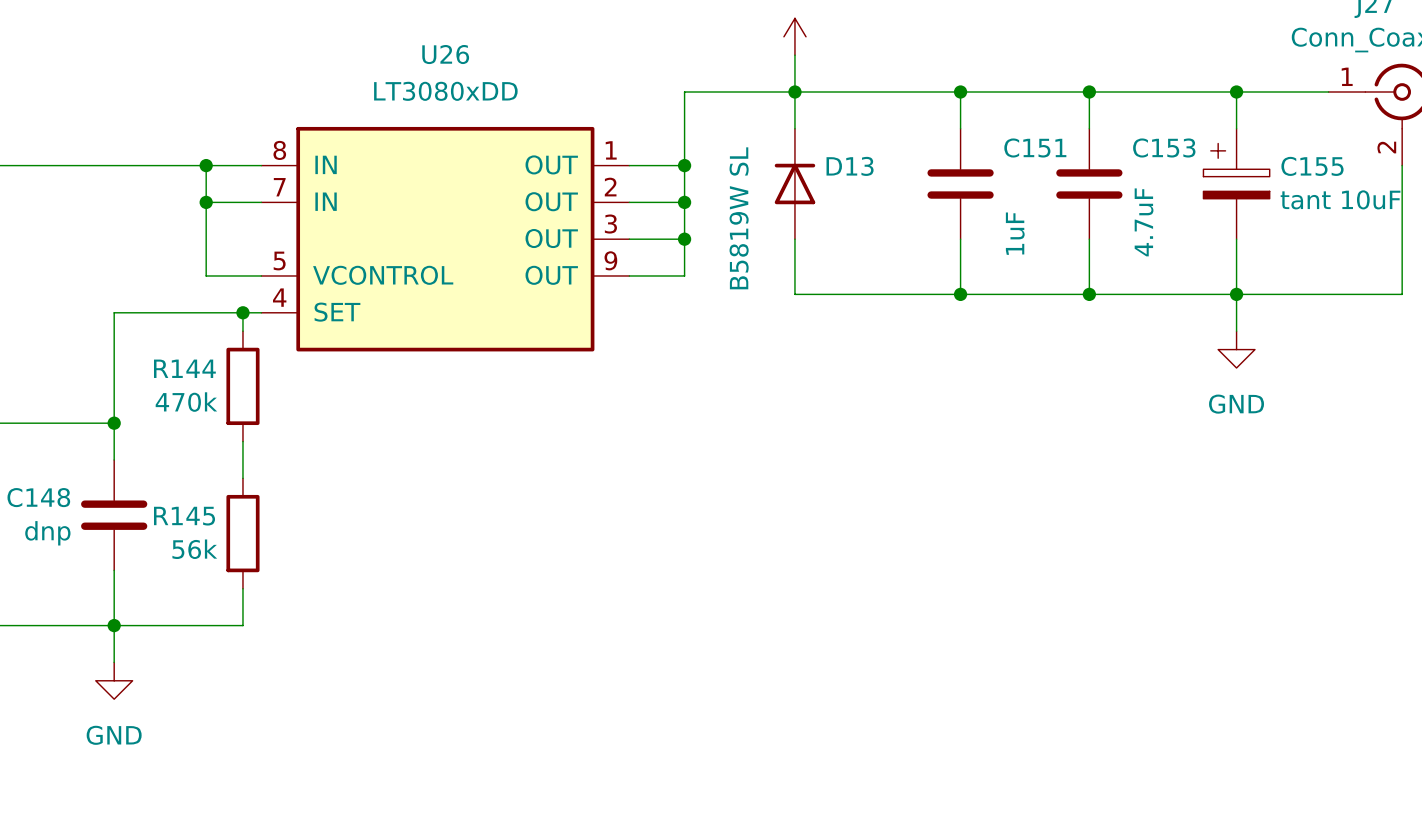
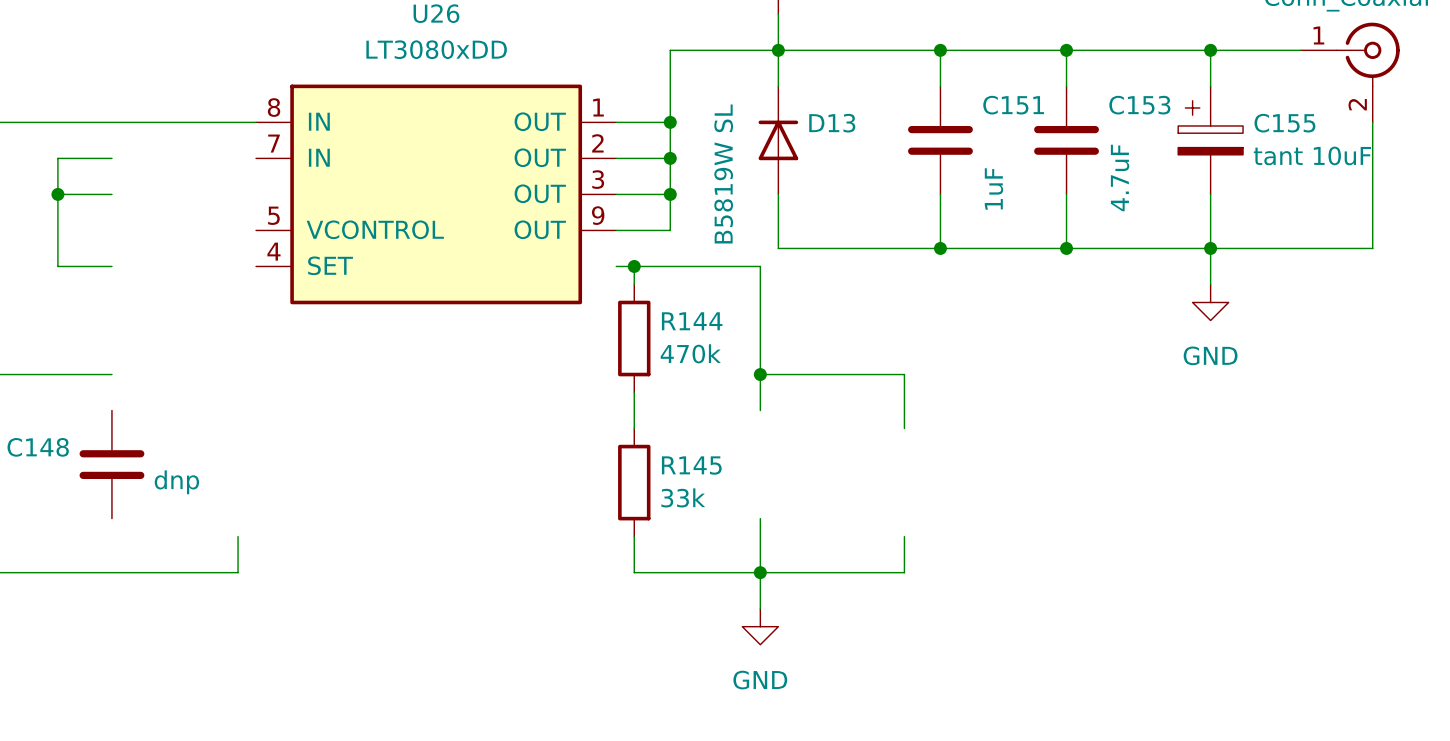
wire: (206, 165) (206, 275) (261, 275) -> none
junction: (206, 165) -> none
wire: none -> (111, 158) (57, 158) (57, 266) (111, 266)
wire: (206, 202) (261, 202) -> (57, 194) (111, 194)
junction: (206, 202) -> none
junction: none -> (57, 194)
wire: (242, 312) (242, 331) -> none
junction: (242, 312) -> none
wire: (261, 312) (114, 312) (114, 459) -> none
wire: none -> (616, 266) (760, 266) (760, 410)
wire: none -> (634, 266) (634, 284)
junction: none -> (634, 266)
R144 name position: R144 (184, 368) -> R144 (692, 321)
R144 position: (242, 386) -> (634, 338)
R144 value position: 470k (186, 402) -> 470k (690, 353)
junction: (114, 423) -> none
wire: none -> (760, 374) (904, 374) (904, 428)
junction: none -> (760, 374)
wire: (242, 441) (242, 478) -> none
wire: none -> (634, 392) (634, 428)
R145 name position: R145 (184, 516) -> R145 (691, 465)
C148 value position: dnp (47, 533) -> dnp (176, 482)
R145 position: (242, 533) -> (634, 482)
R145 value: 56k (194, 549) -> 33k (683, 497)
wire: (114, 570) (114, 662) -> none
wire: none -> (760, 518) (760, 608)
wire: none -> (634, 536) (634, 572) (904, 572) (904, 536)
junction: (114, 625) -> none
junction: none -> (760, 572)
power symbol: GND (114, 680) -> none
power symbol: none -> GND (760, 626)

